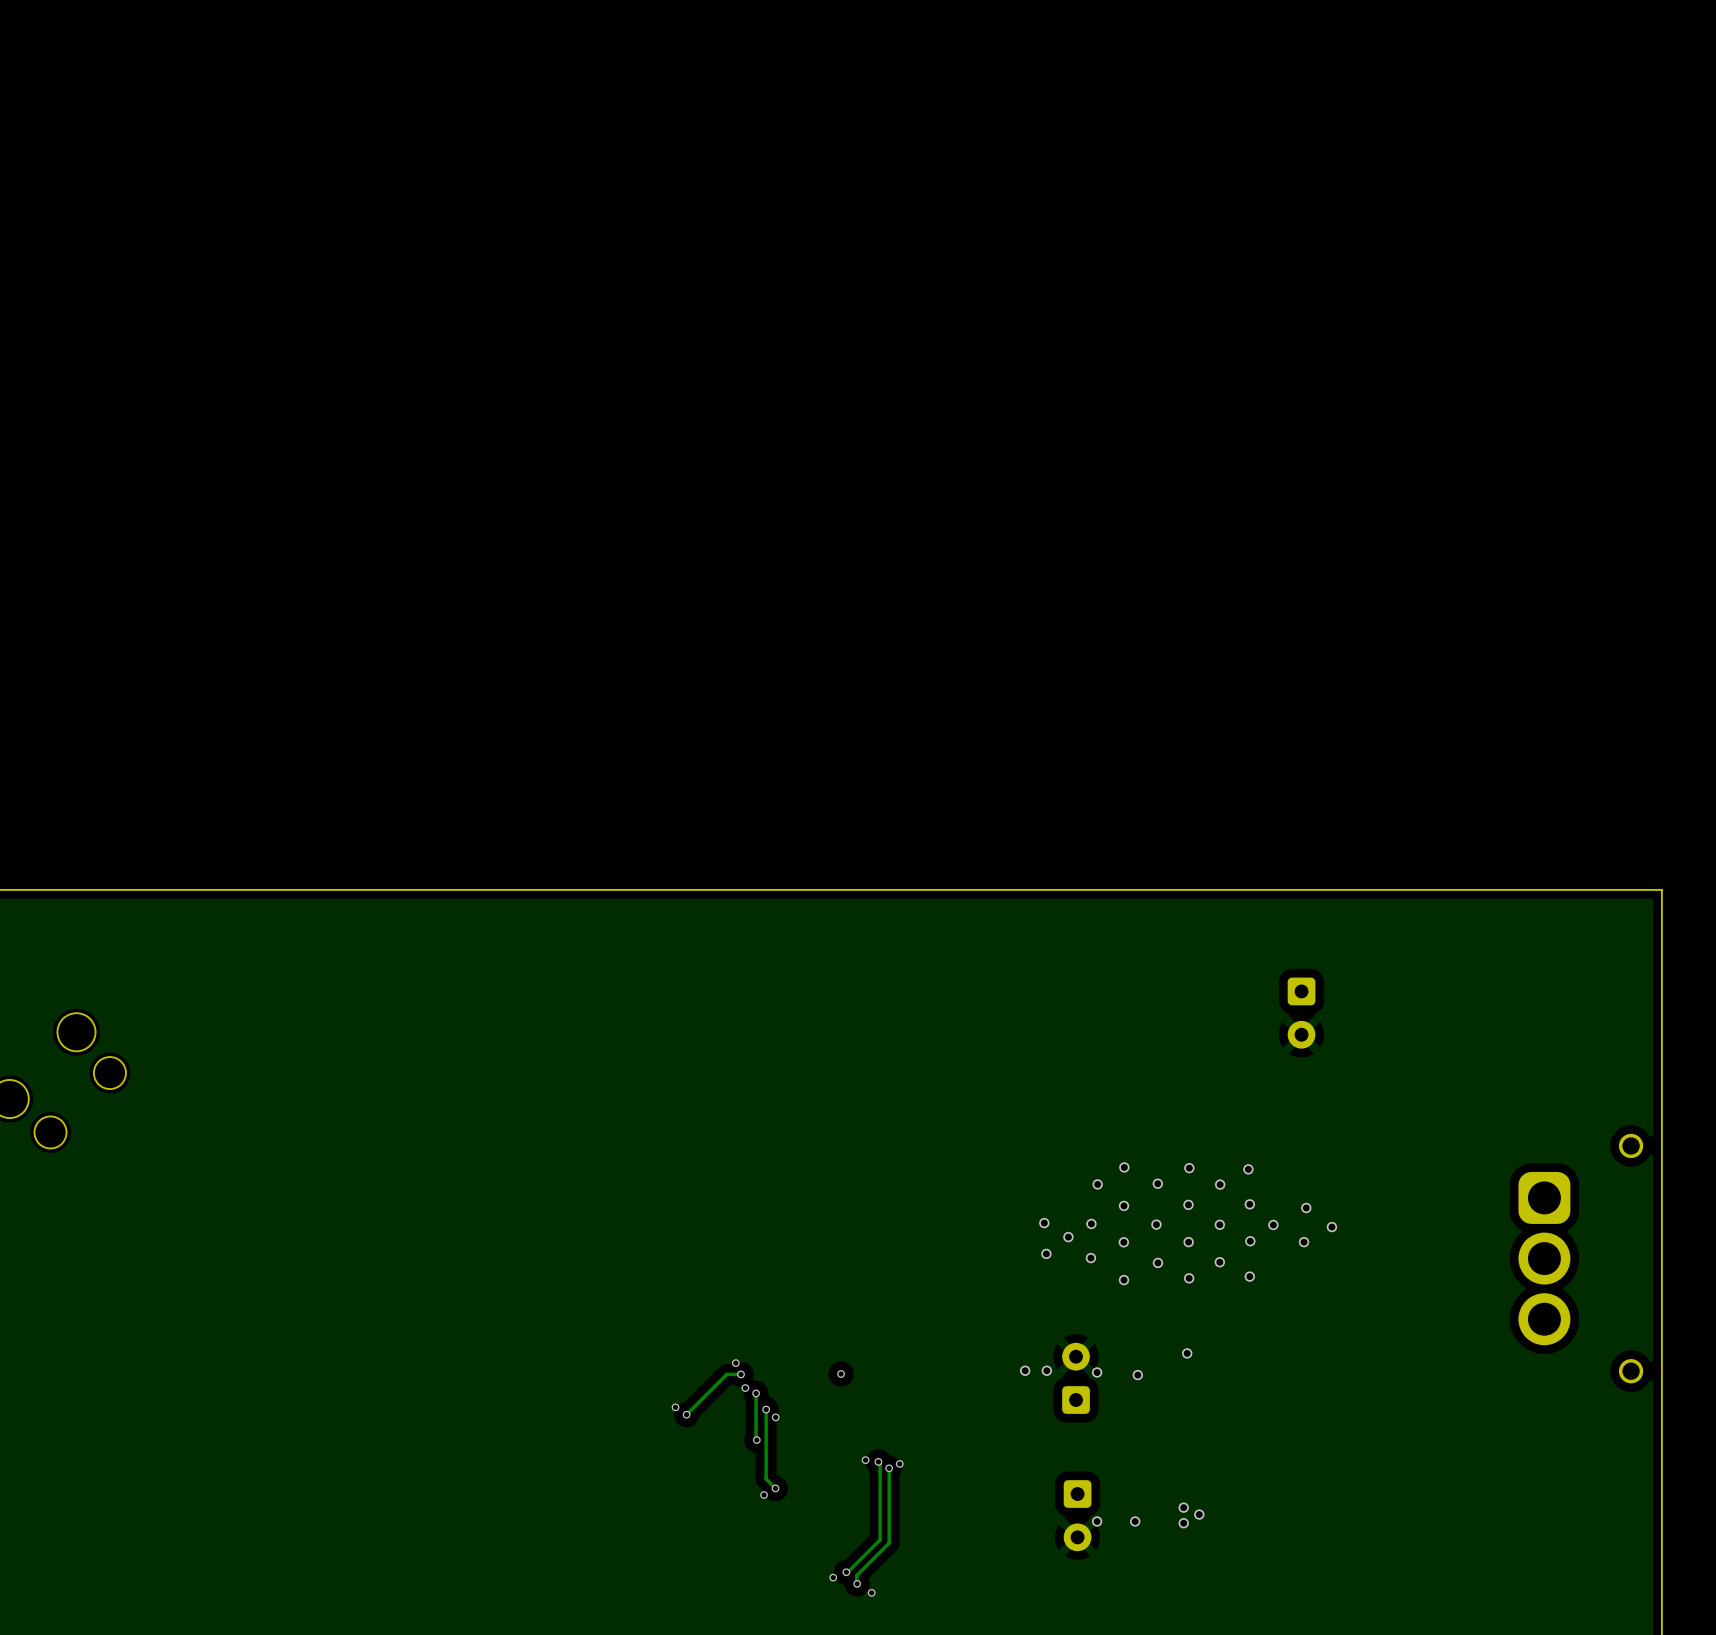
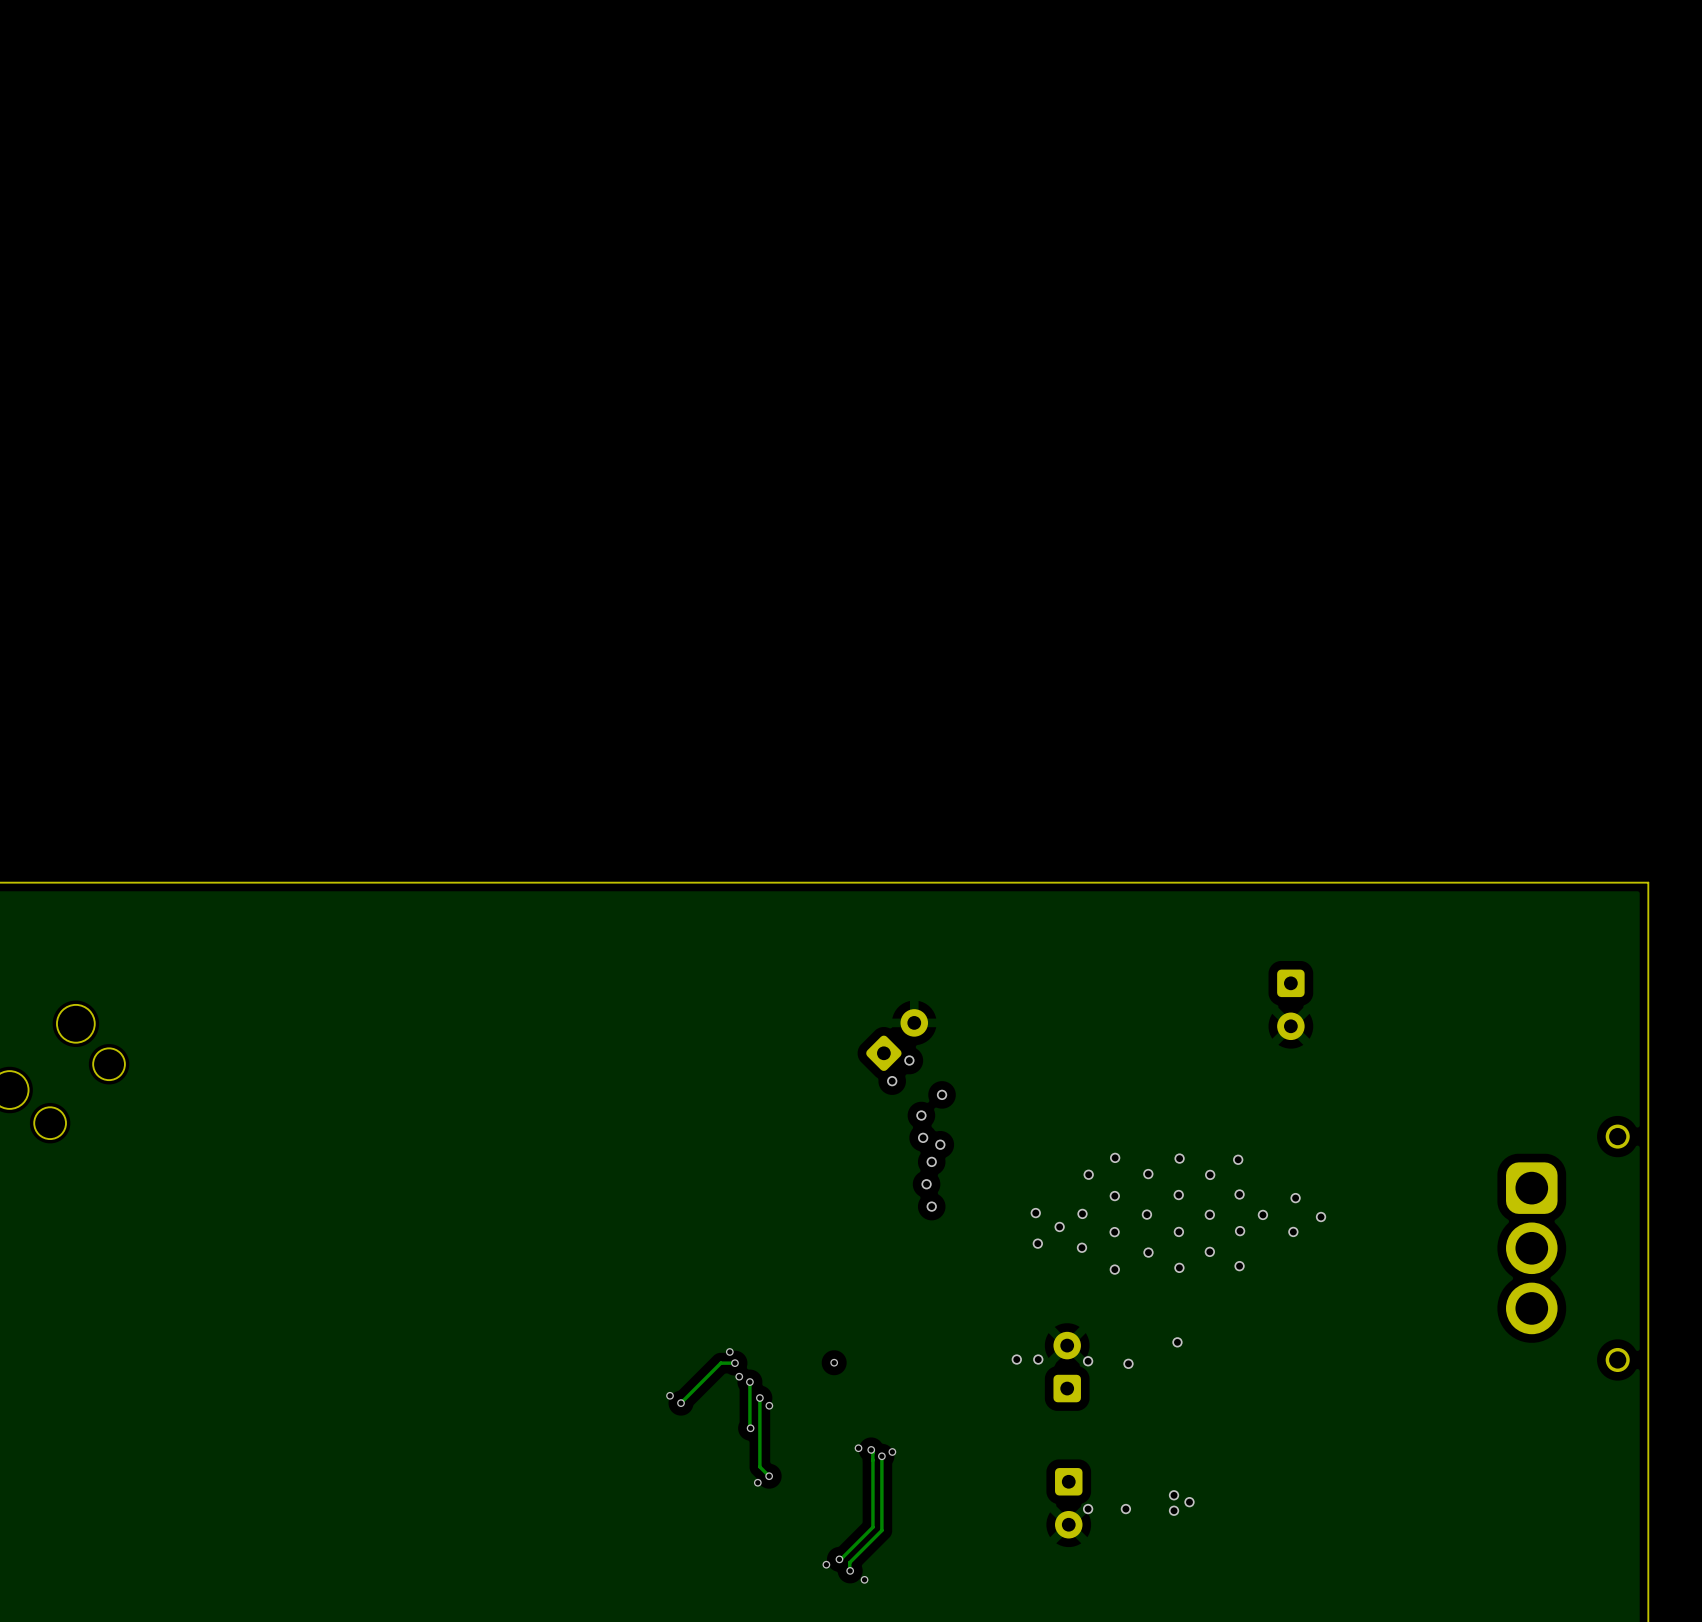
part: none -> (897, 1040)
via: none -> (909, 1060)
via: none -> (892, 1081)
via: none -> (942, 1094)
via: none -> (921, 1115)
via: none -> (923, 1137)
via: none -> (940, 1144)
via: none -> (931, 1161)
via: none -> (926, 1184)
via: none -> (931, 1206)

